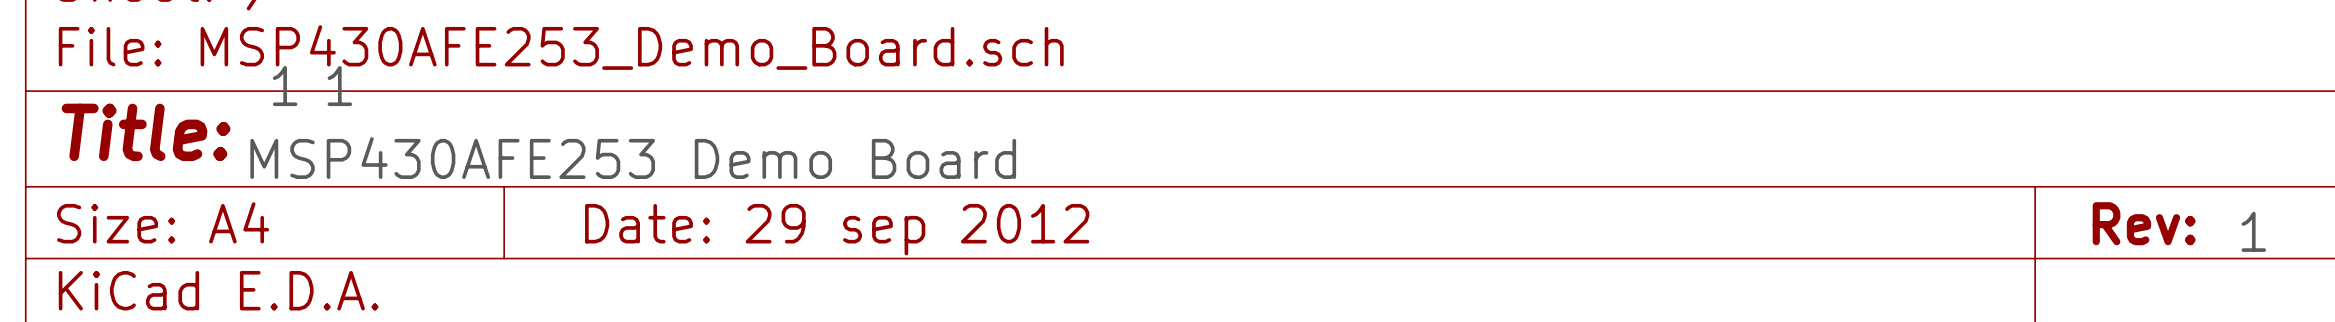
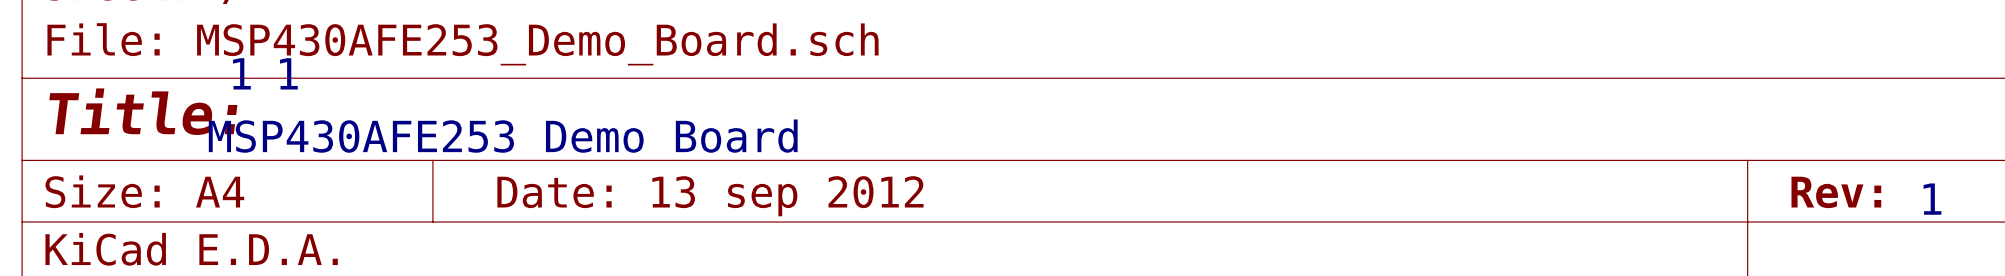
title block: Date: 29 sep 2012 (837, 229) -> Date: 13 sep 2012 (710, 196)

